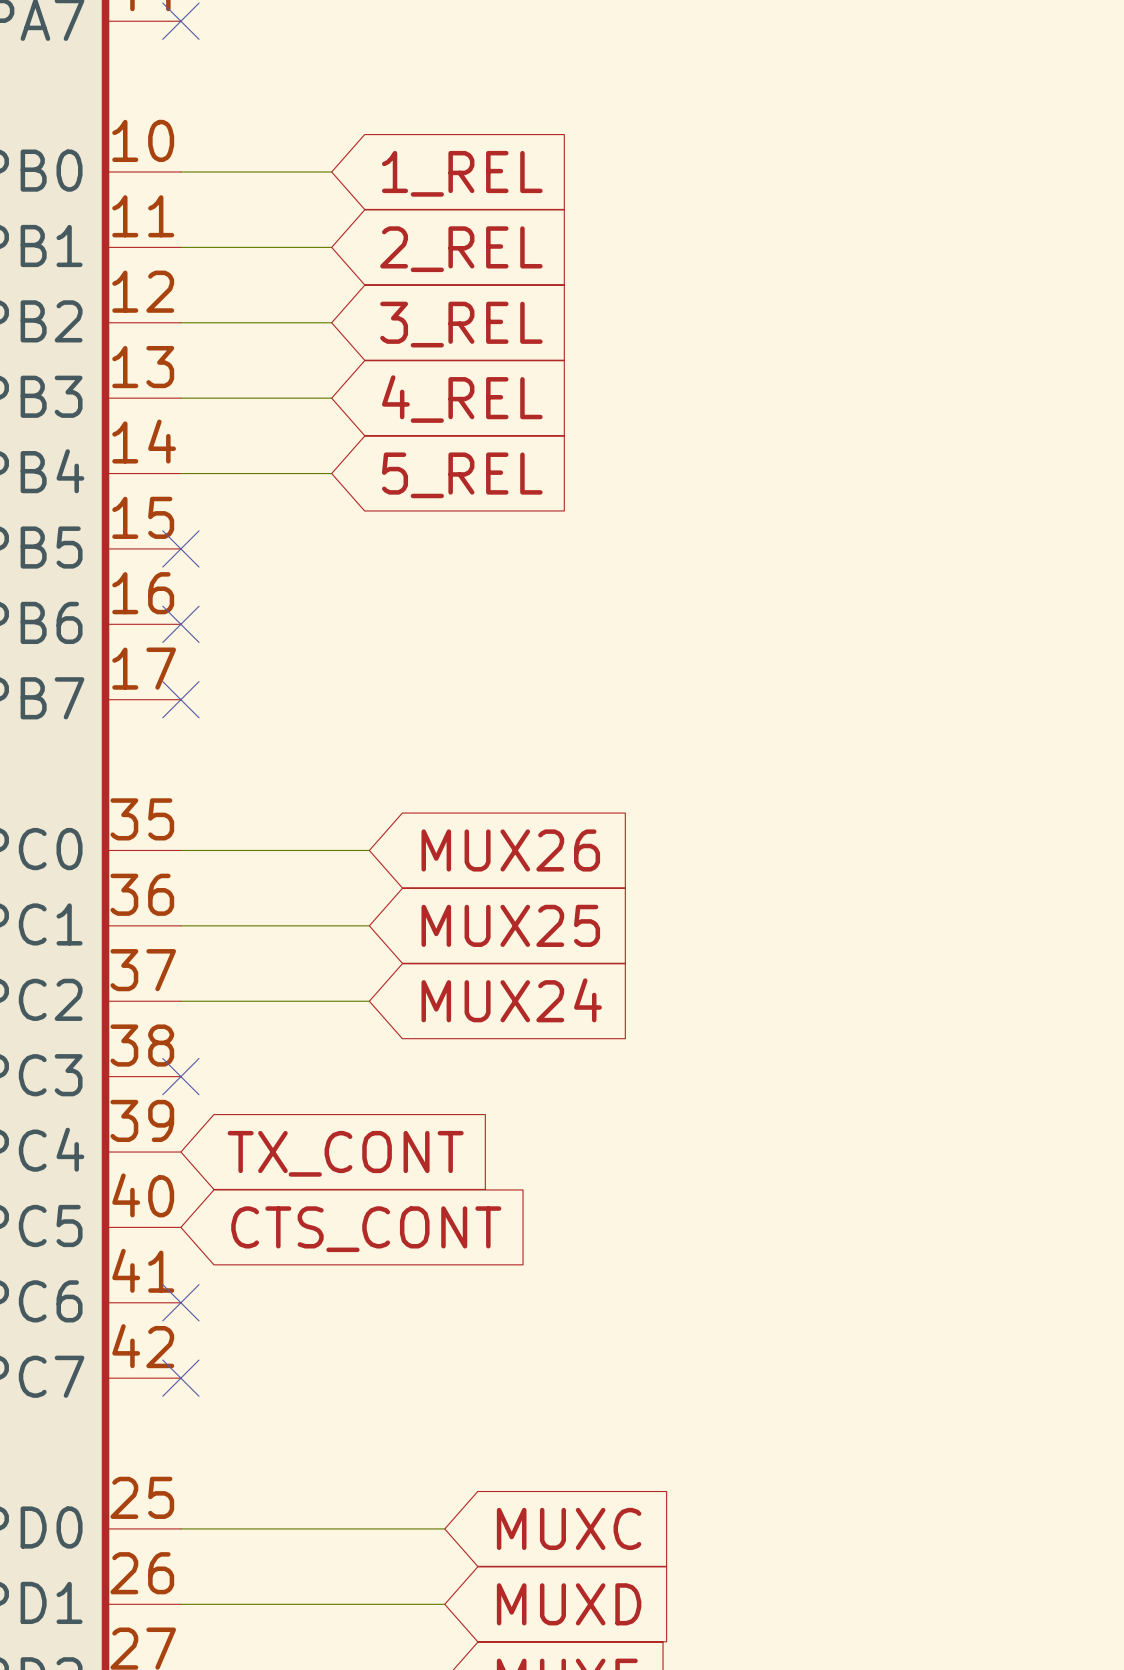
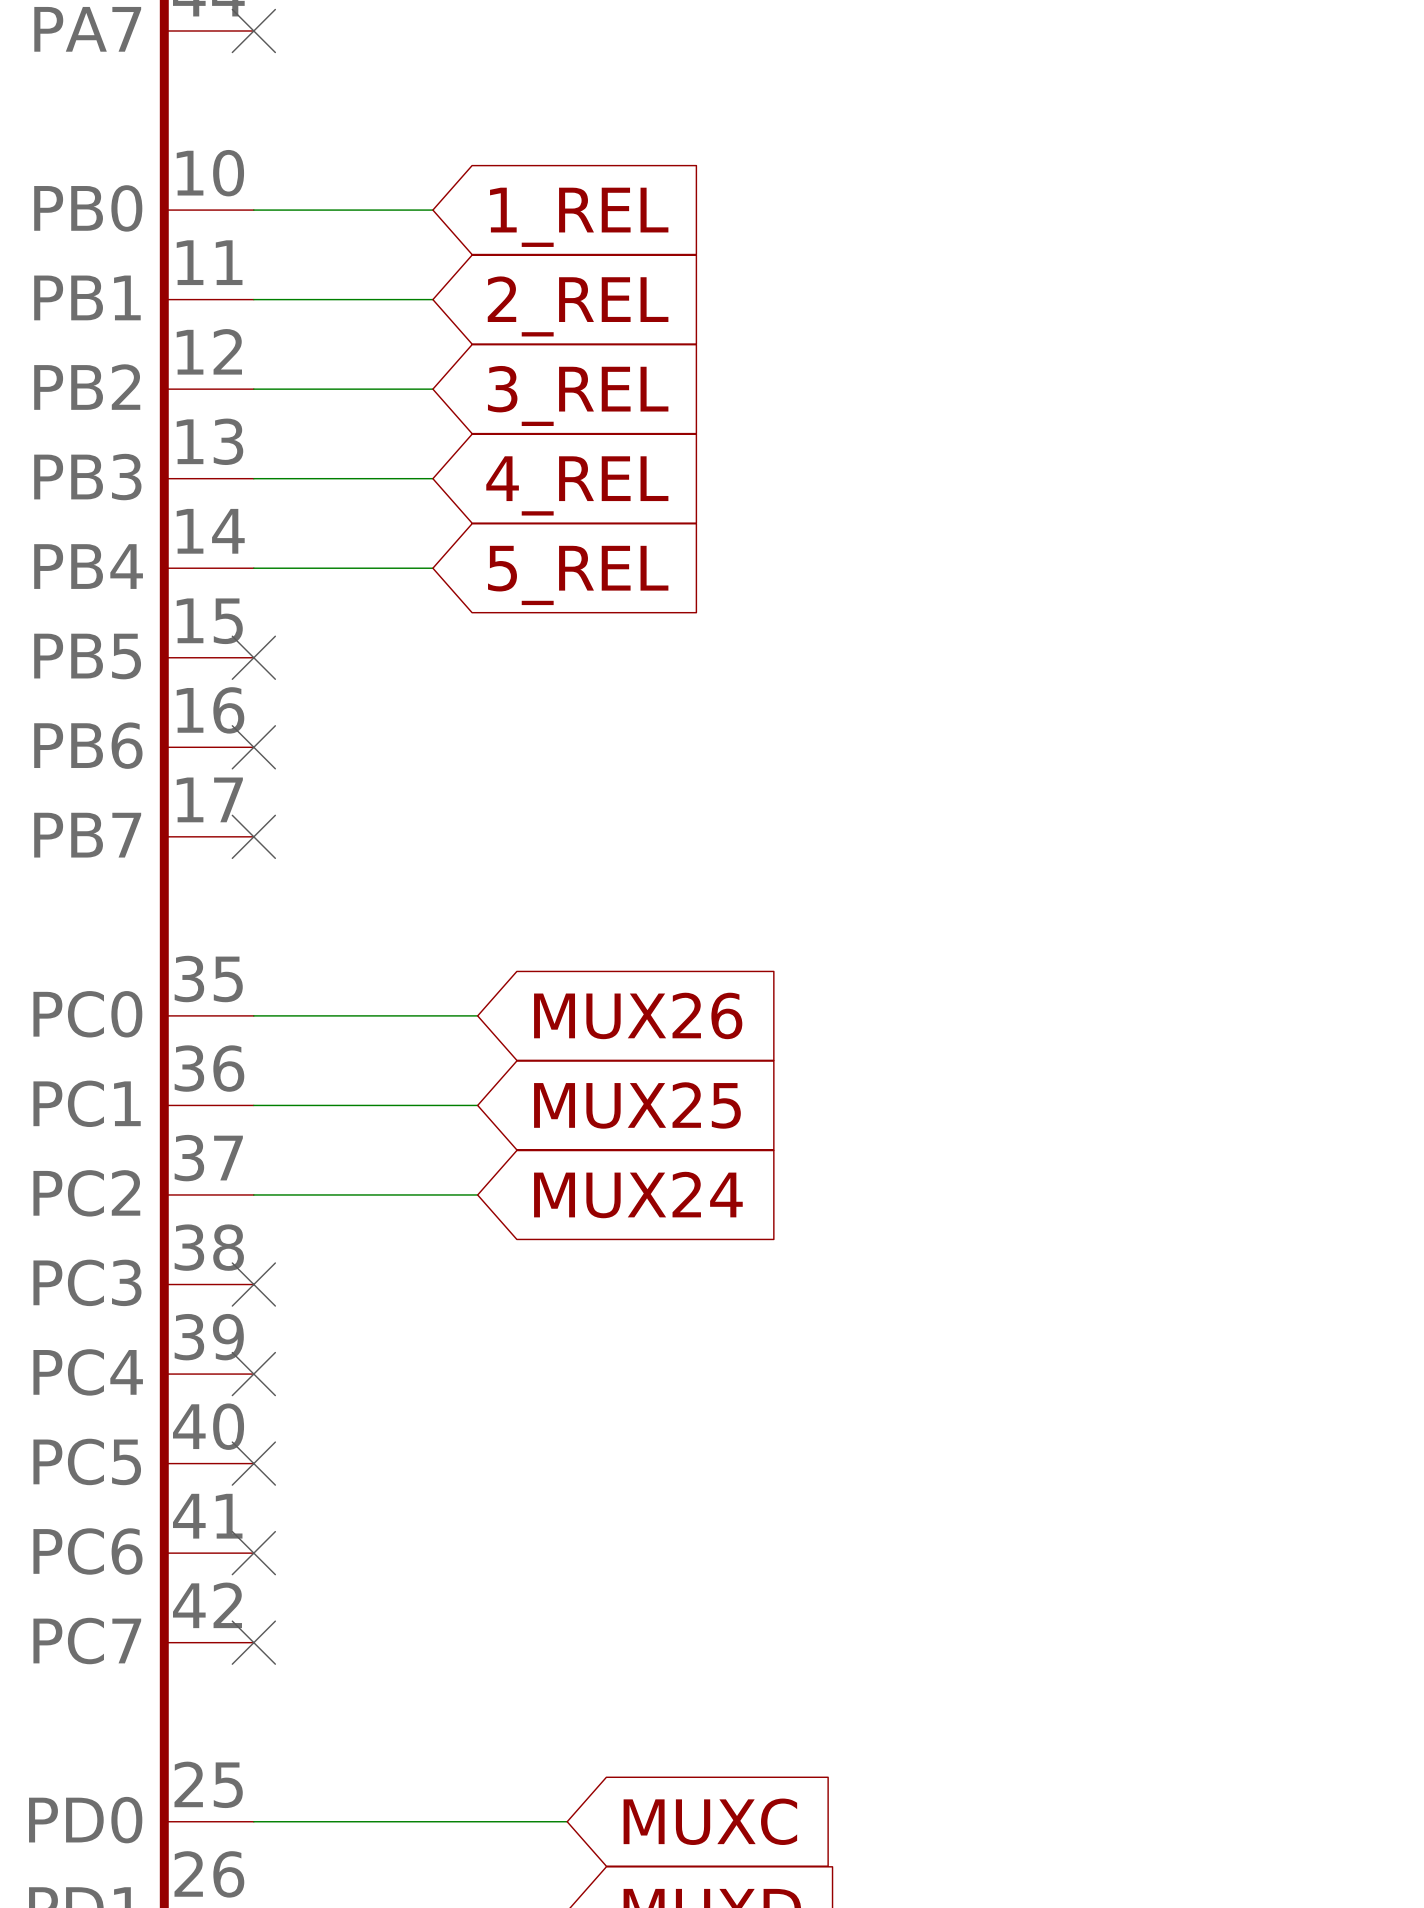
no-connect mark: none -> (253, 1374)
global label: TX_CONT (345, 1153) -> none
no-connect mark: none -> (253, 1463)
global label: CTS_CONT (366, 1229) -> none

